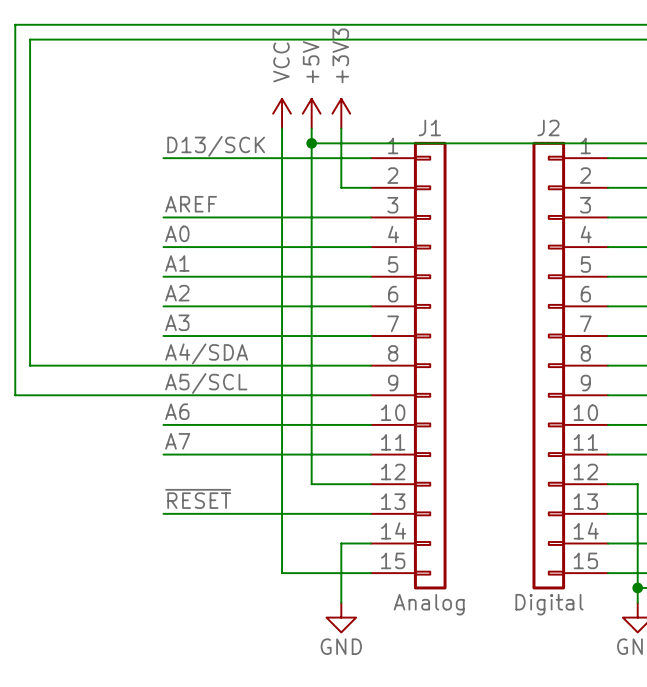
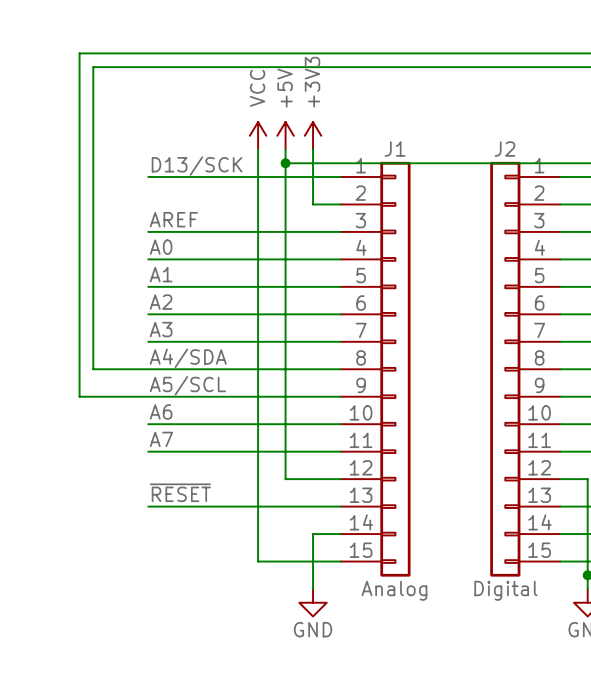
wire: (89, 24) (15, 24) (15, 395) (89, 395) -> (79, 53) (79, 396)
wire: (104, 39) (30, 39) (30, 365) (104, 365) -> (93, 67) (93, 369)

